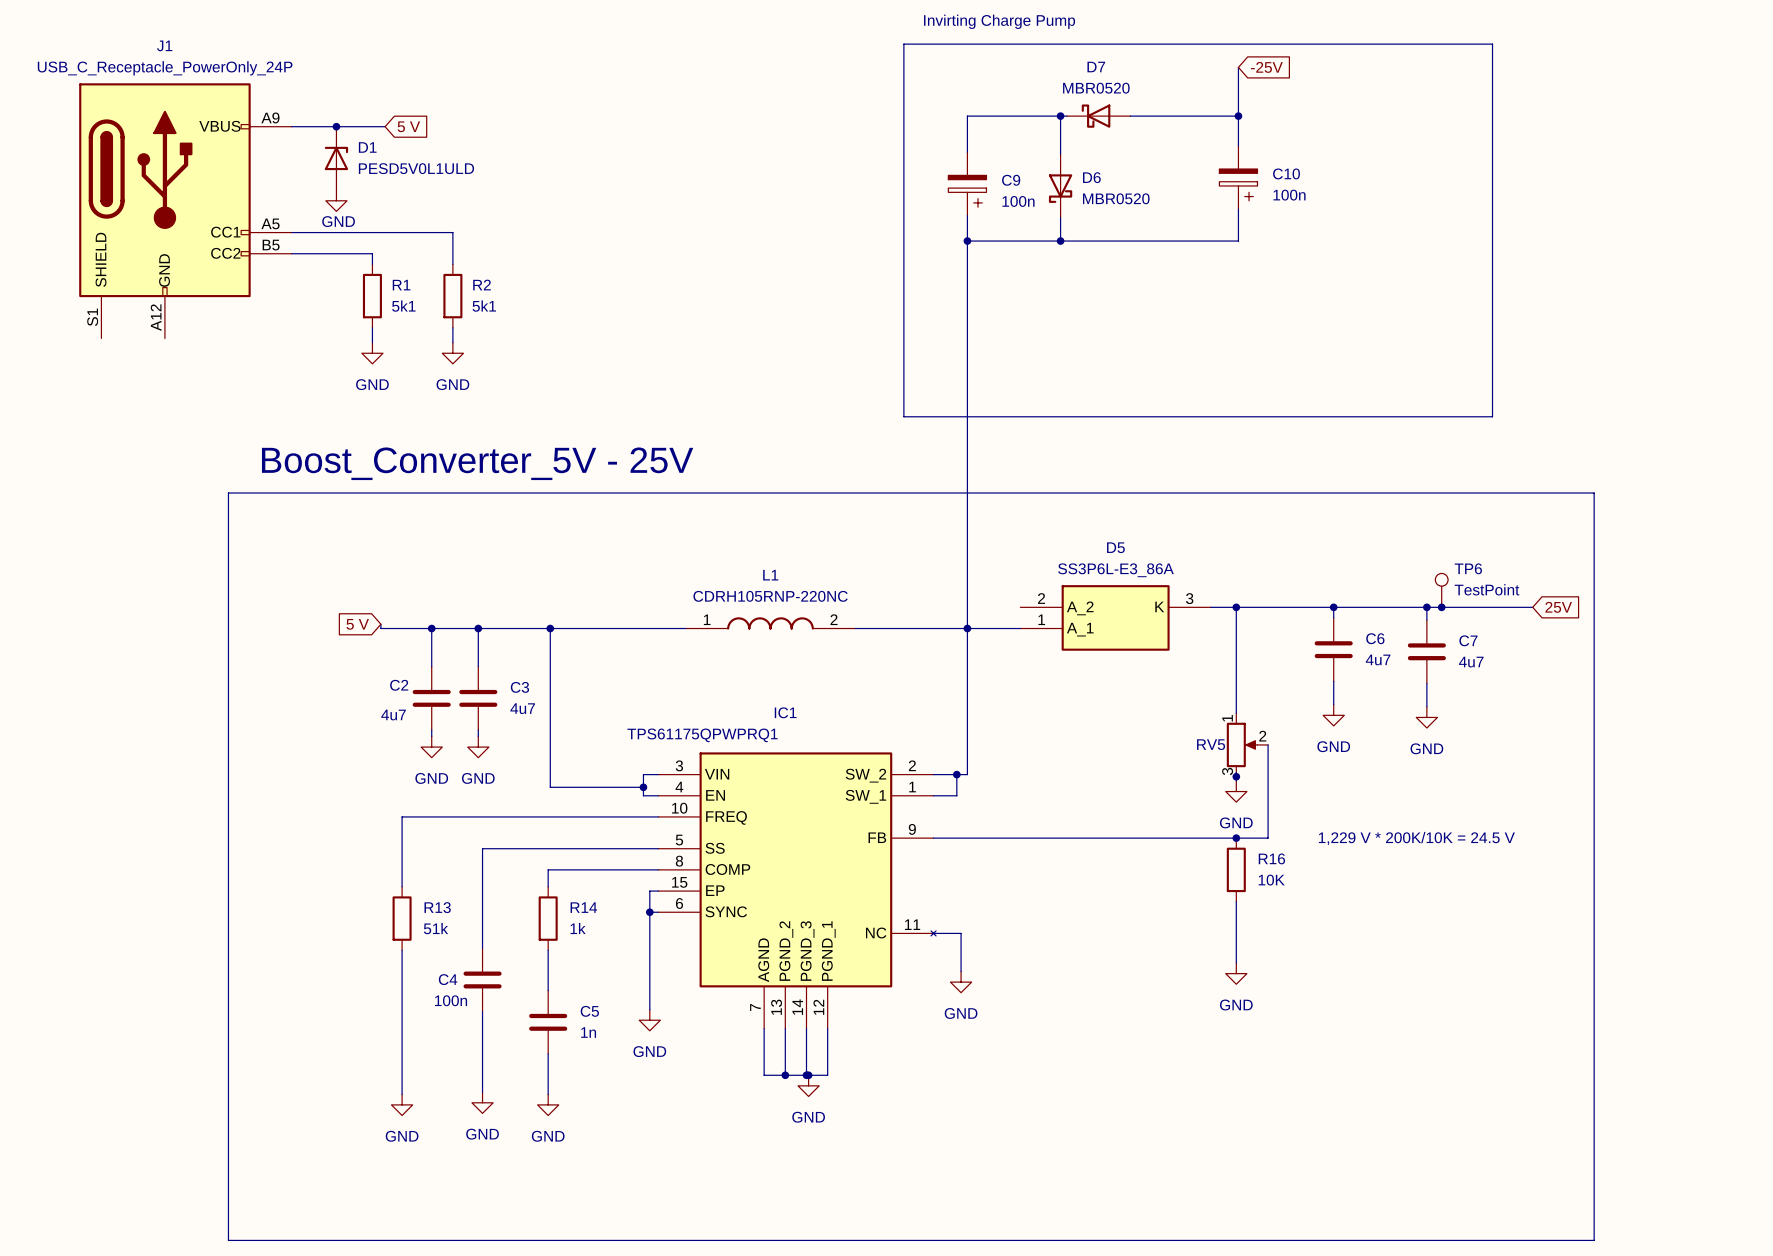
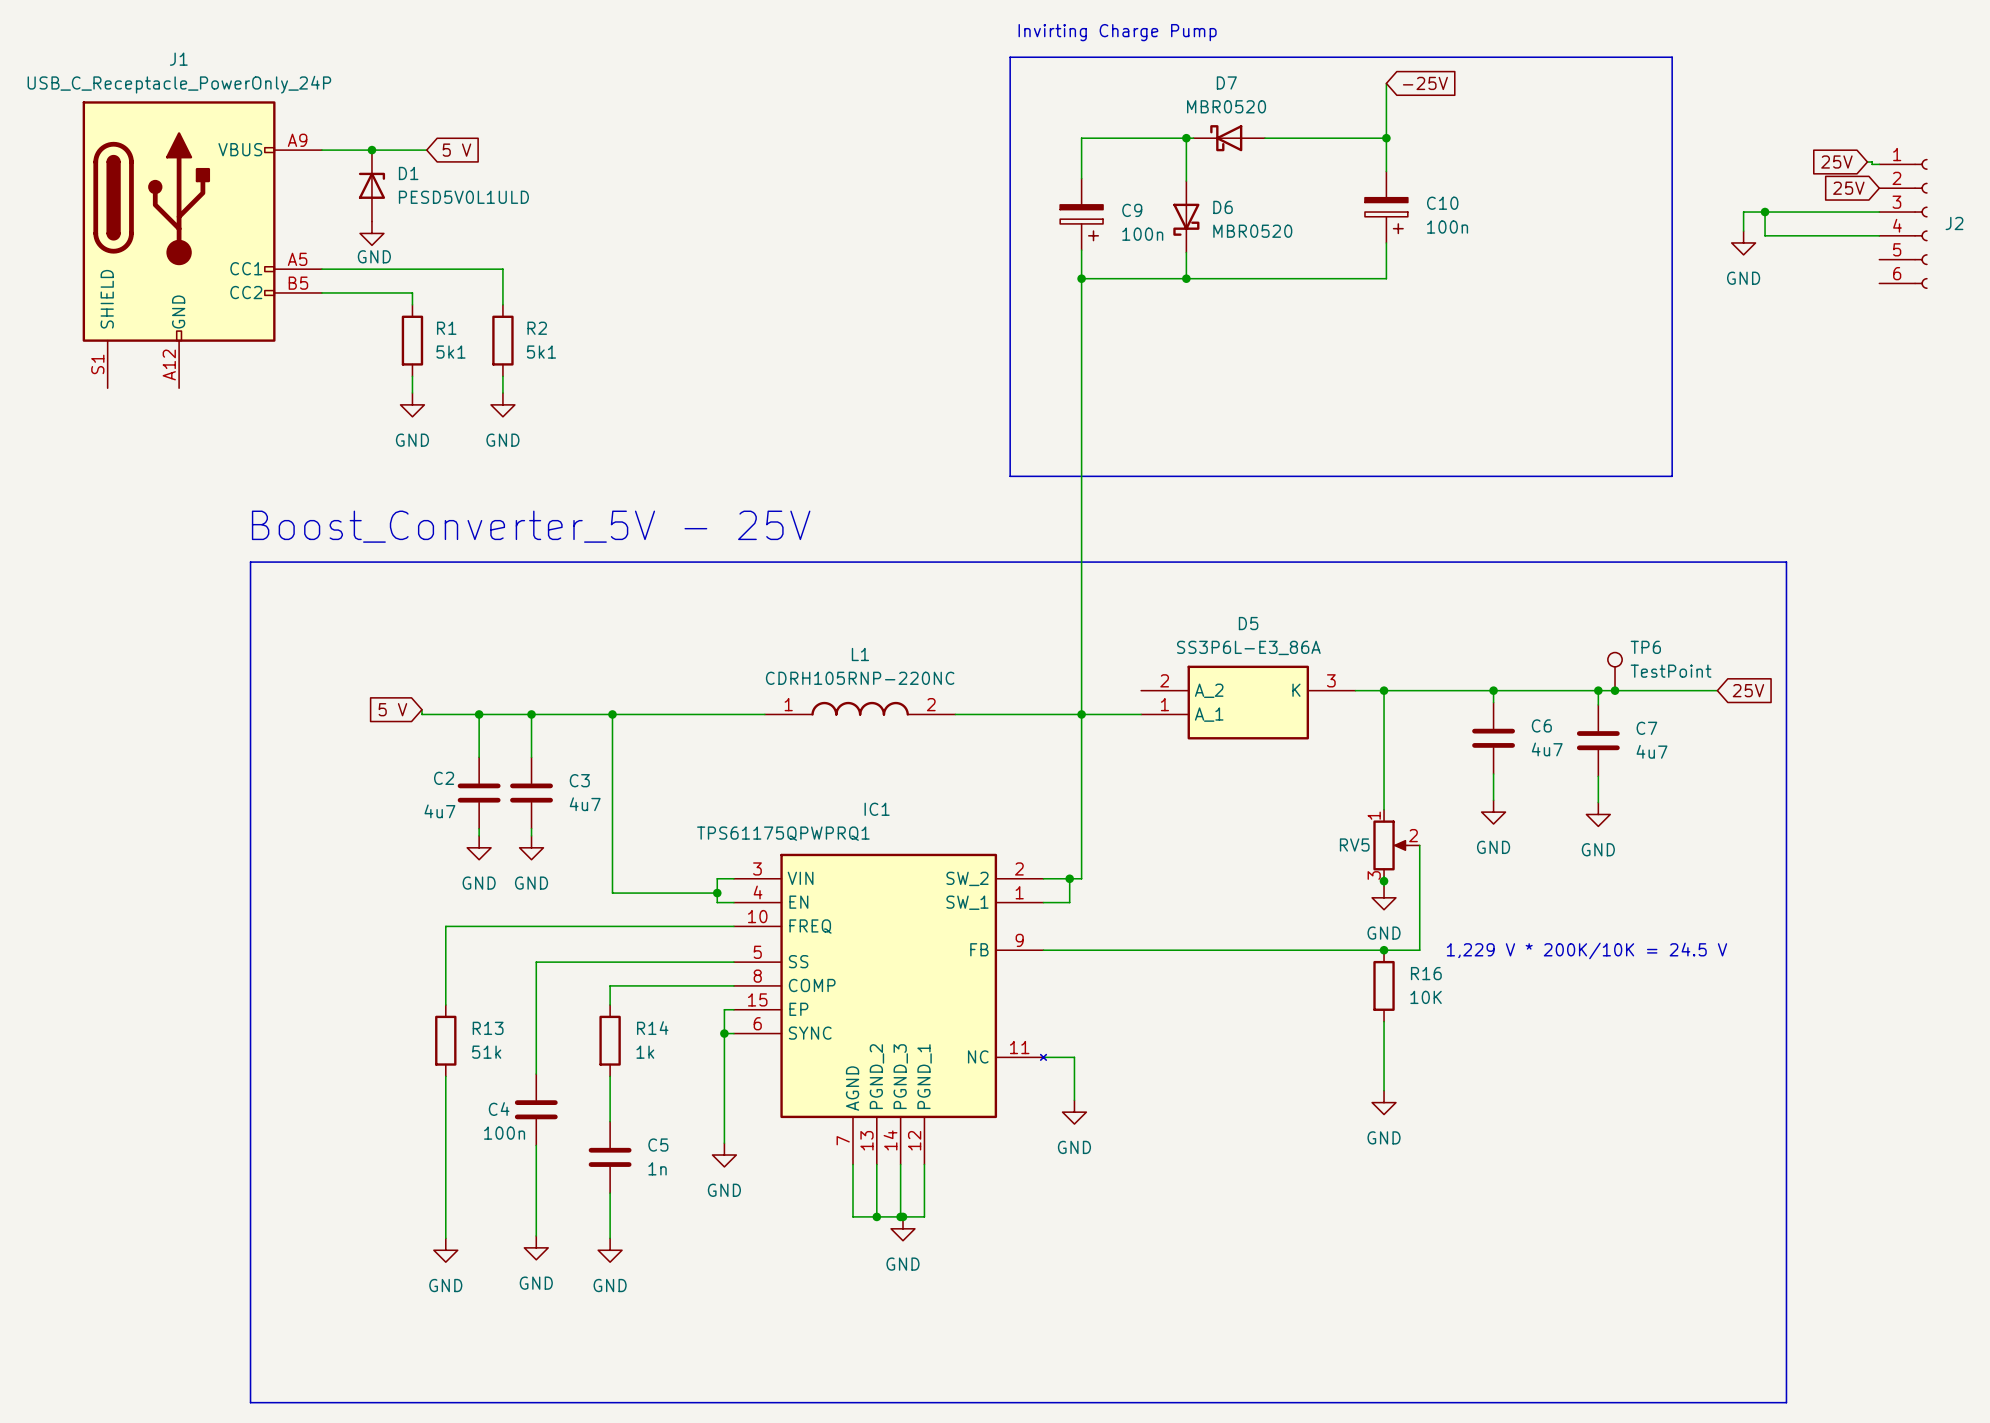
global label: none -> 25V (1836, 162)
wire: none -> (1867, 162) (1879, 164)
global label: none -> 25V (1848, 188)
wire: none -> (1765, 212) (1765, 235) (1879, 235)
junction: none -> (1765, 212)
wire: none -> (1879, 212) (1743, 212) (1743, 231)
J2: none -> (1903, 223)
power symbol: none -> GND (1743, 242)

